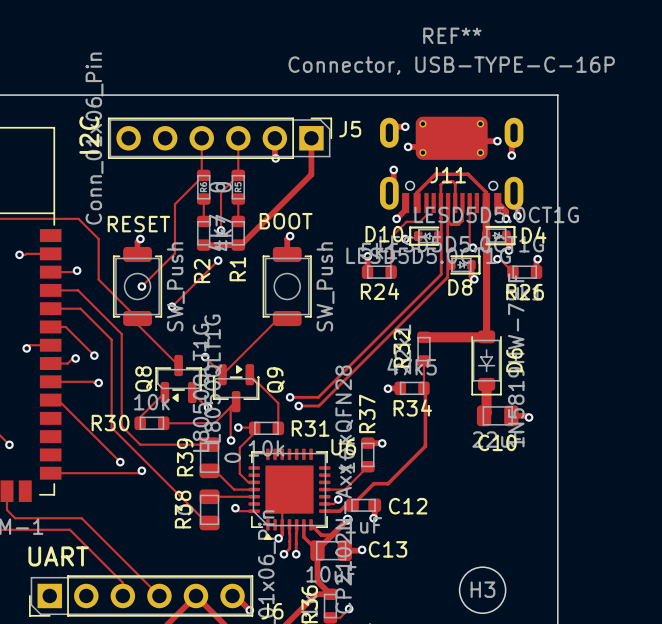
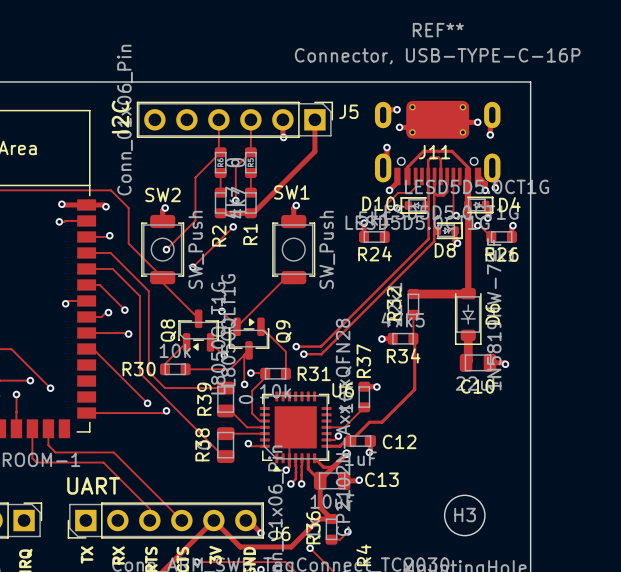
BOOT name: BOOT (286, 221) -> SW1 (291, 192)
RESET name: RESET (138, 224) -> SW2 (163, 194)
track: none -> (61, 204) (104, 204) (105, 206)
via: none -> (61, 204)
via: none -> (105, 206)

